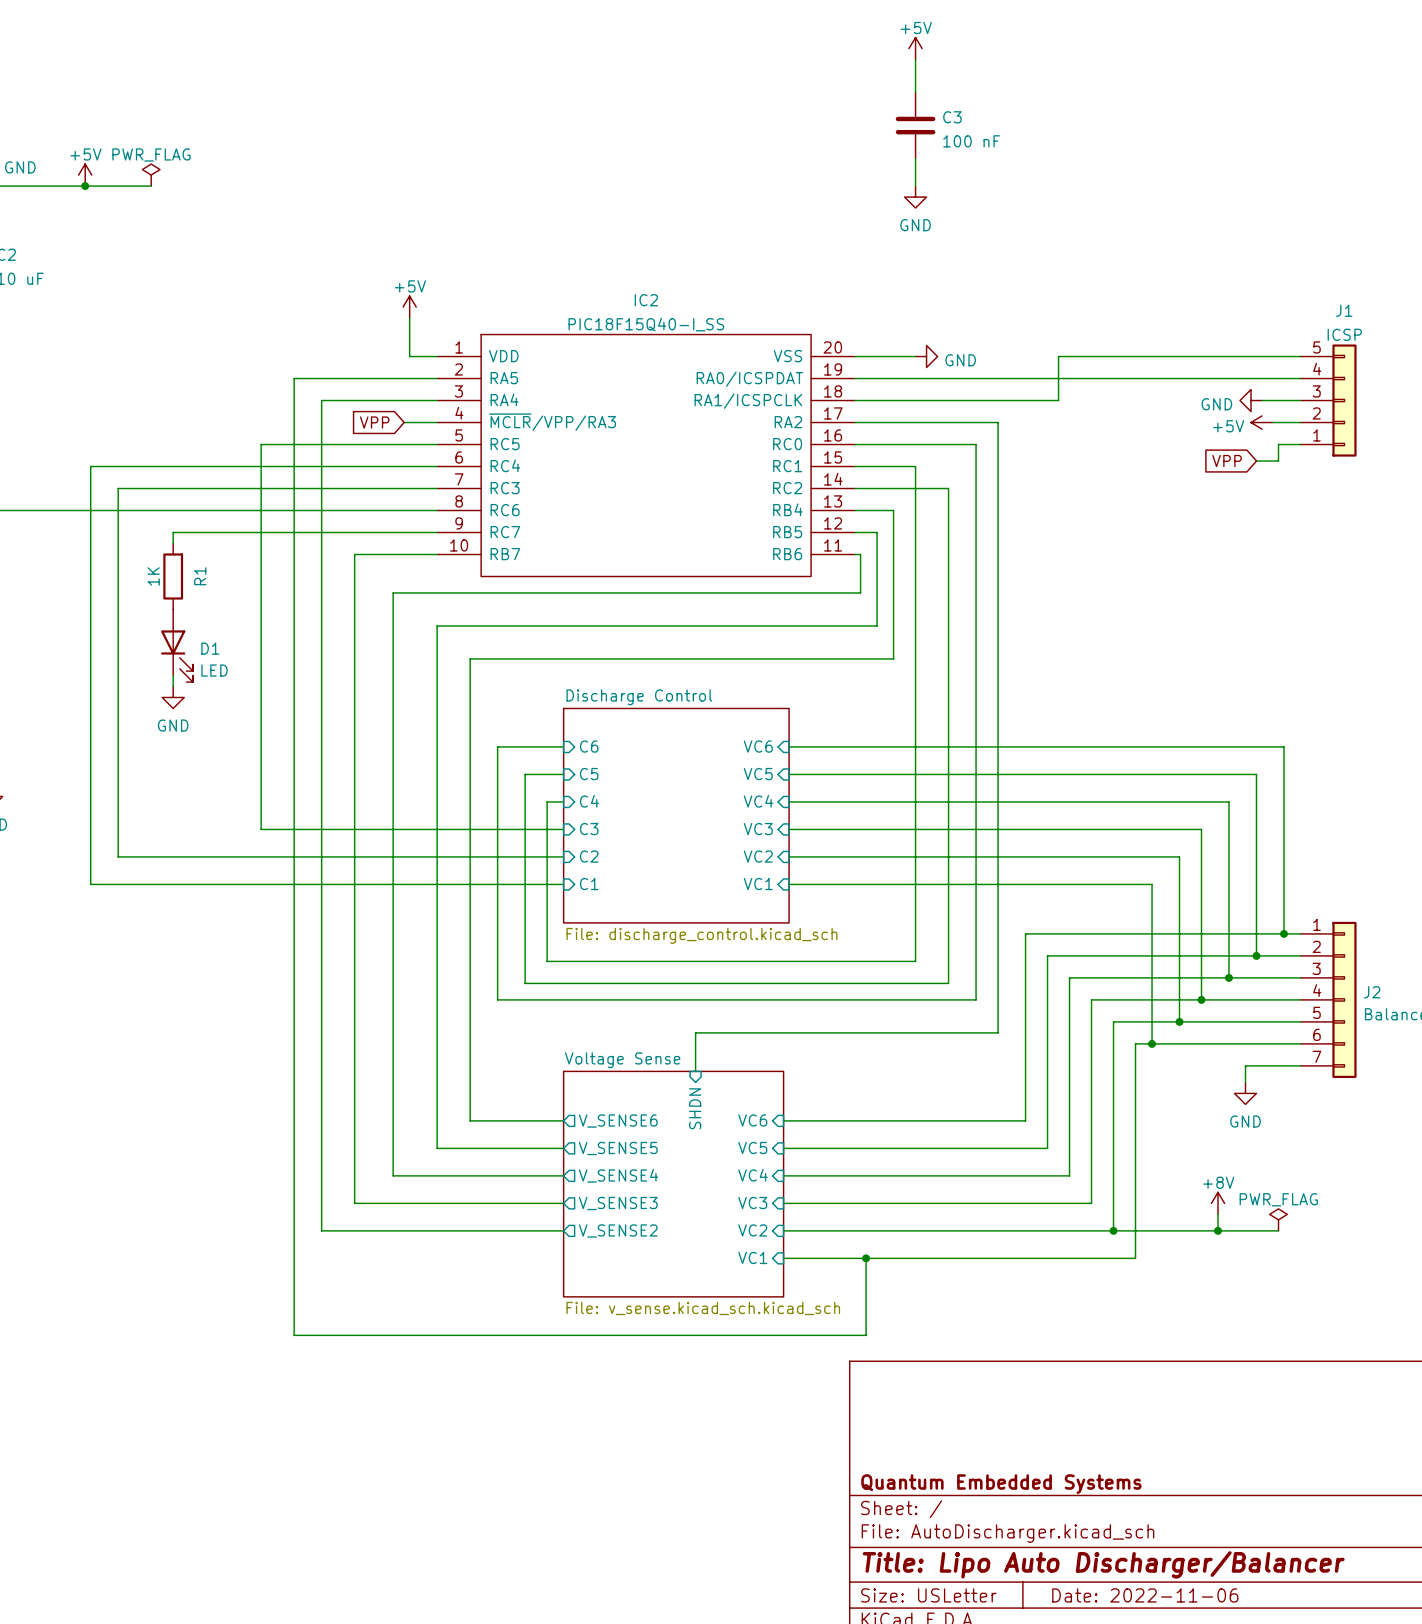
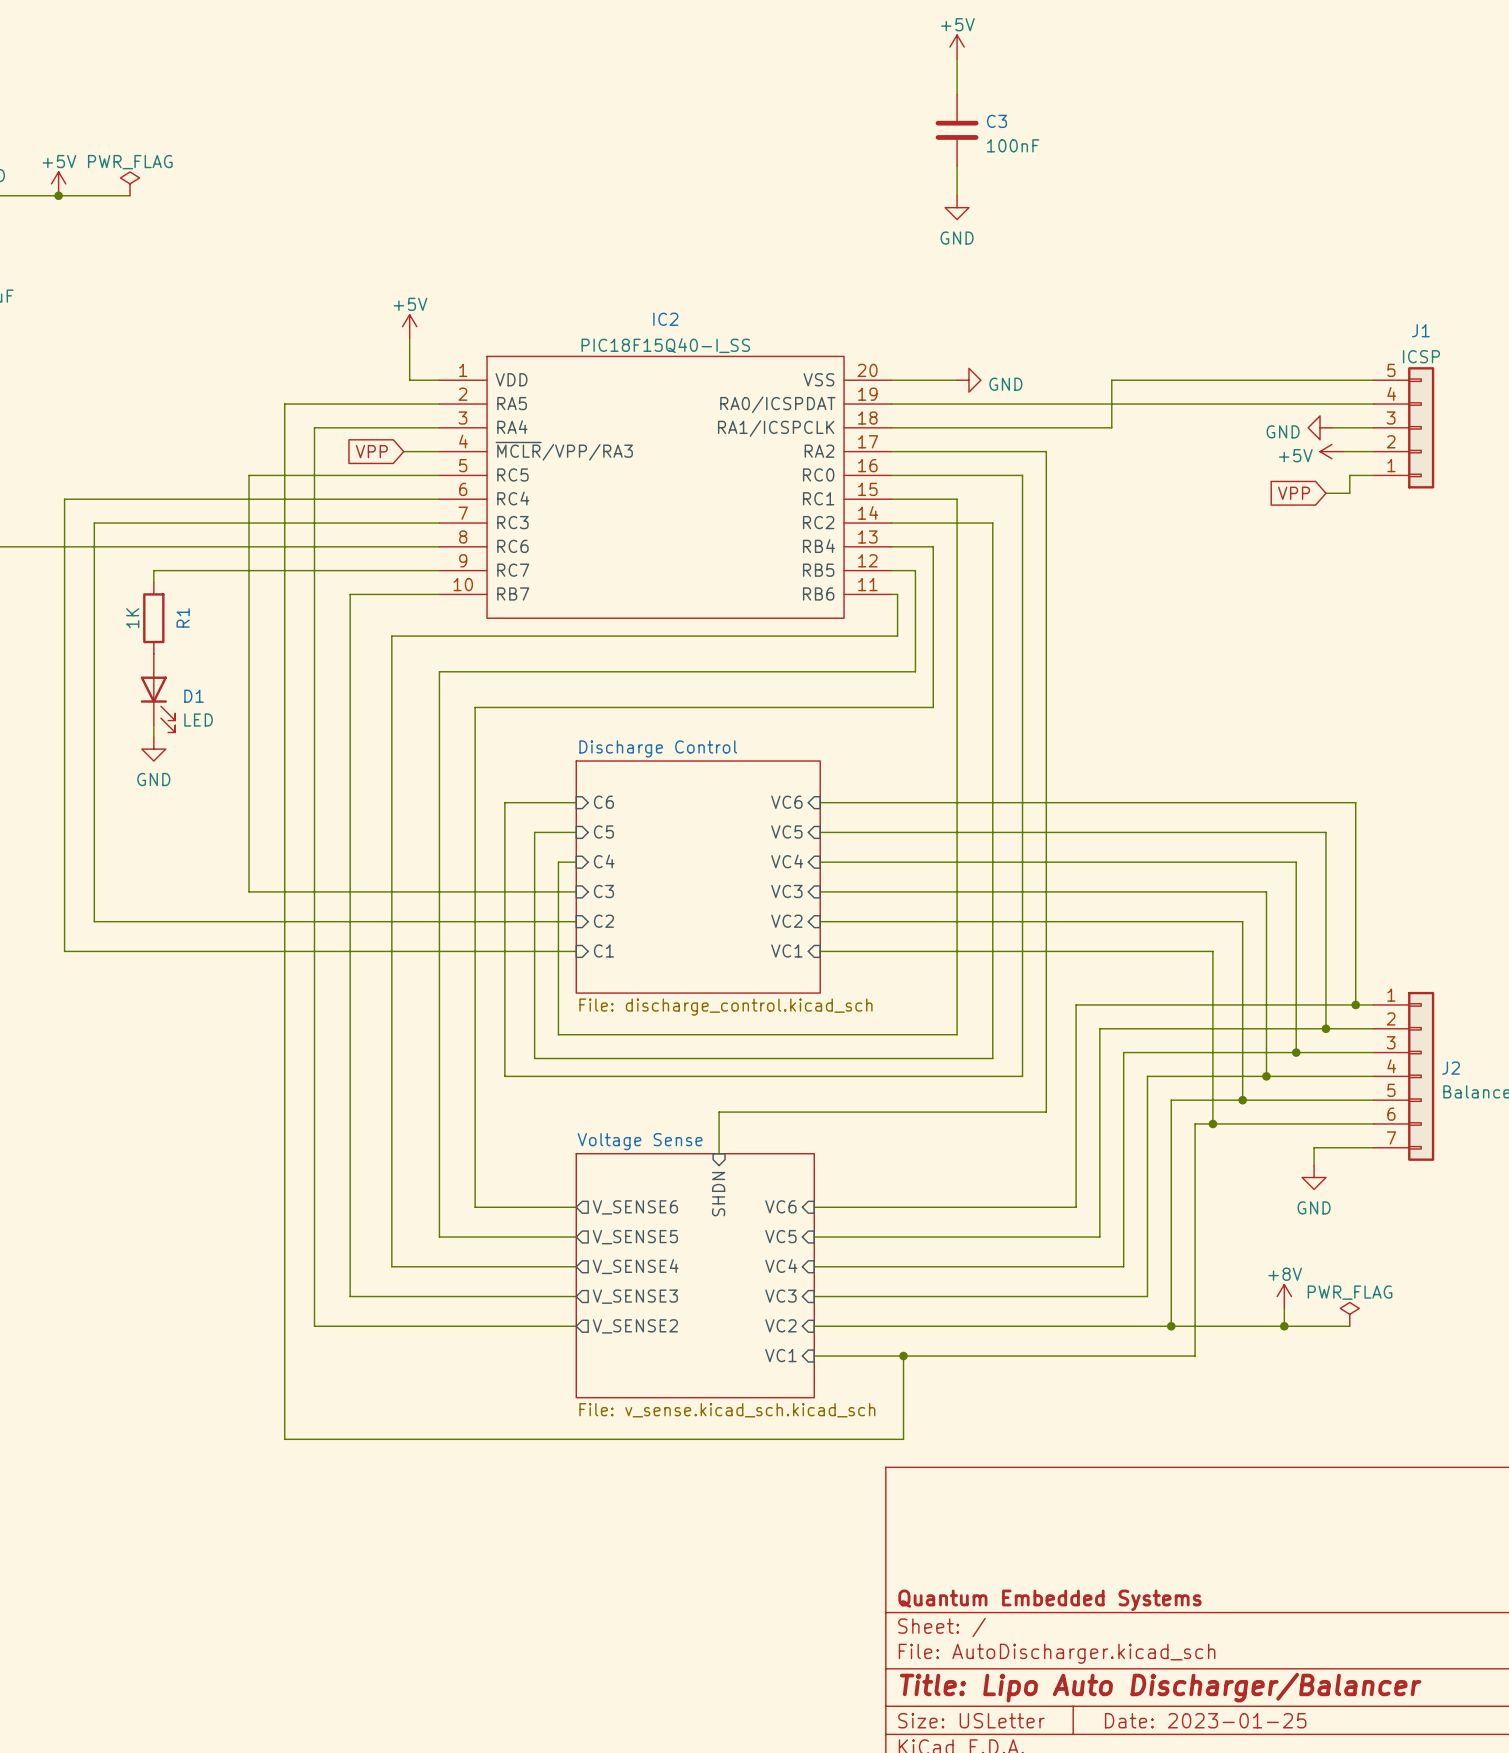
C3 value: 100 nF (971, 141) -> 100nF (1013, 145)
title block: Date: 2022-11-06 (1145, 1595) -> Date: 2023-01-25 (1205, 1720)

